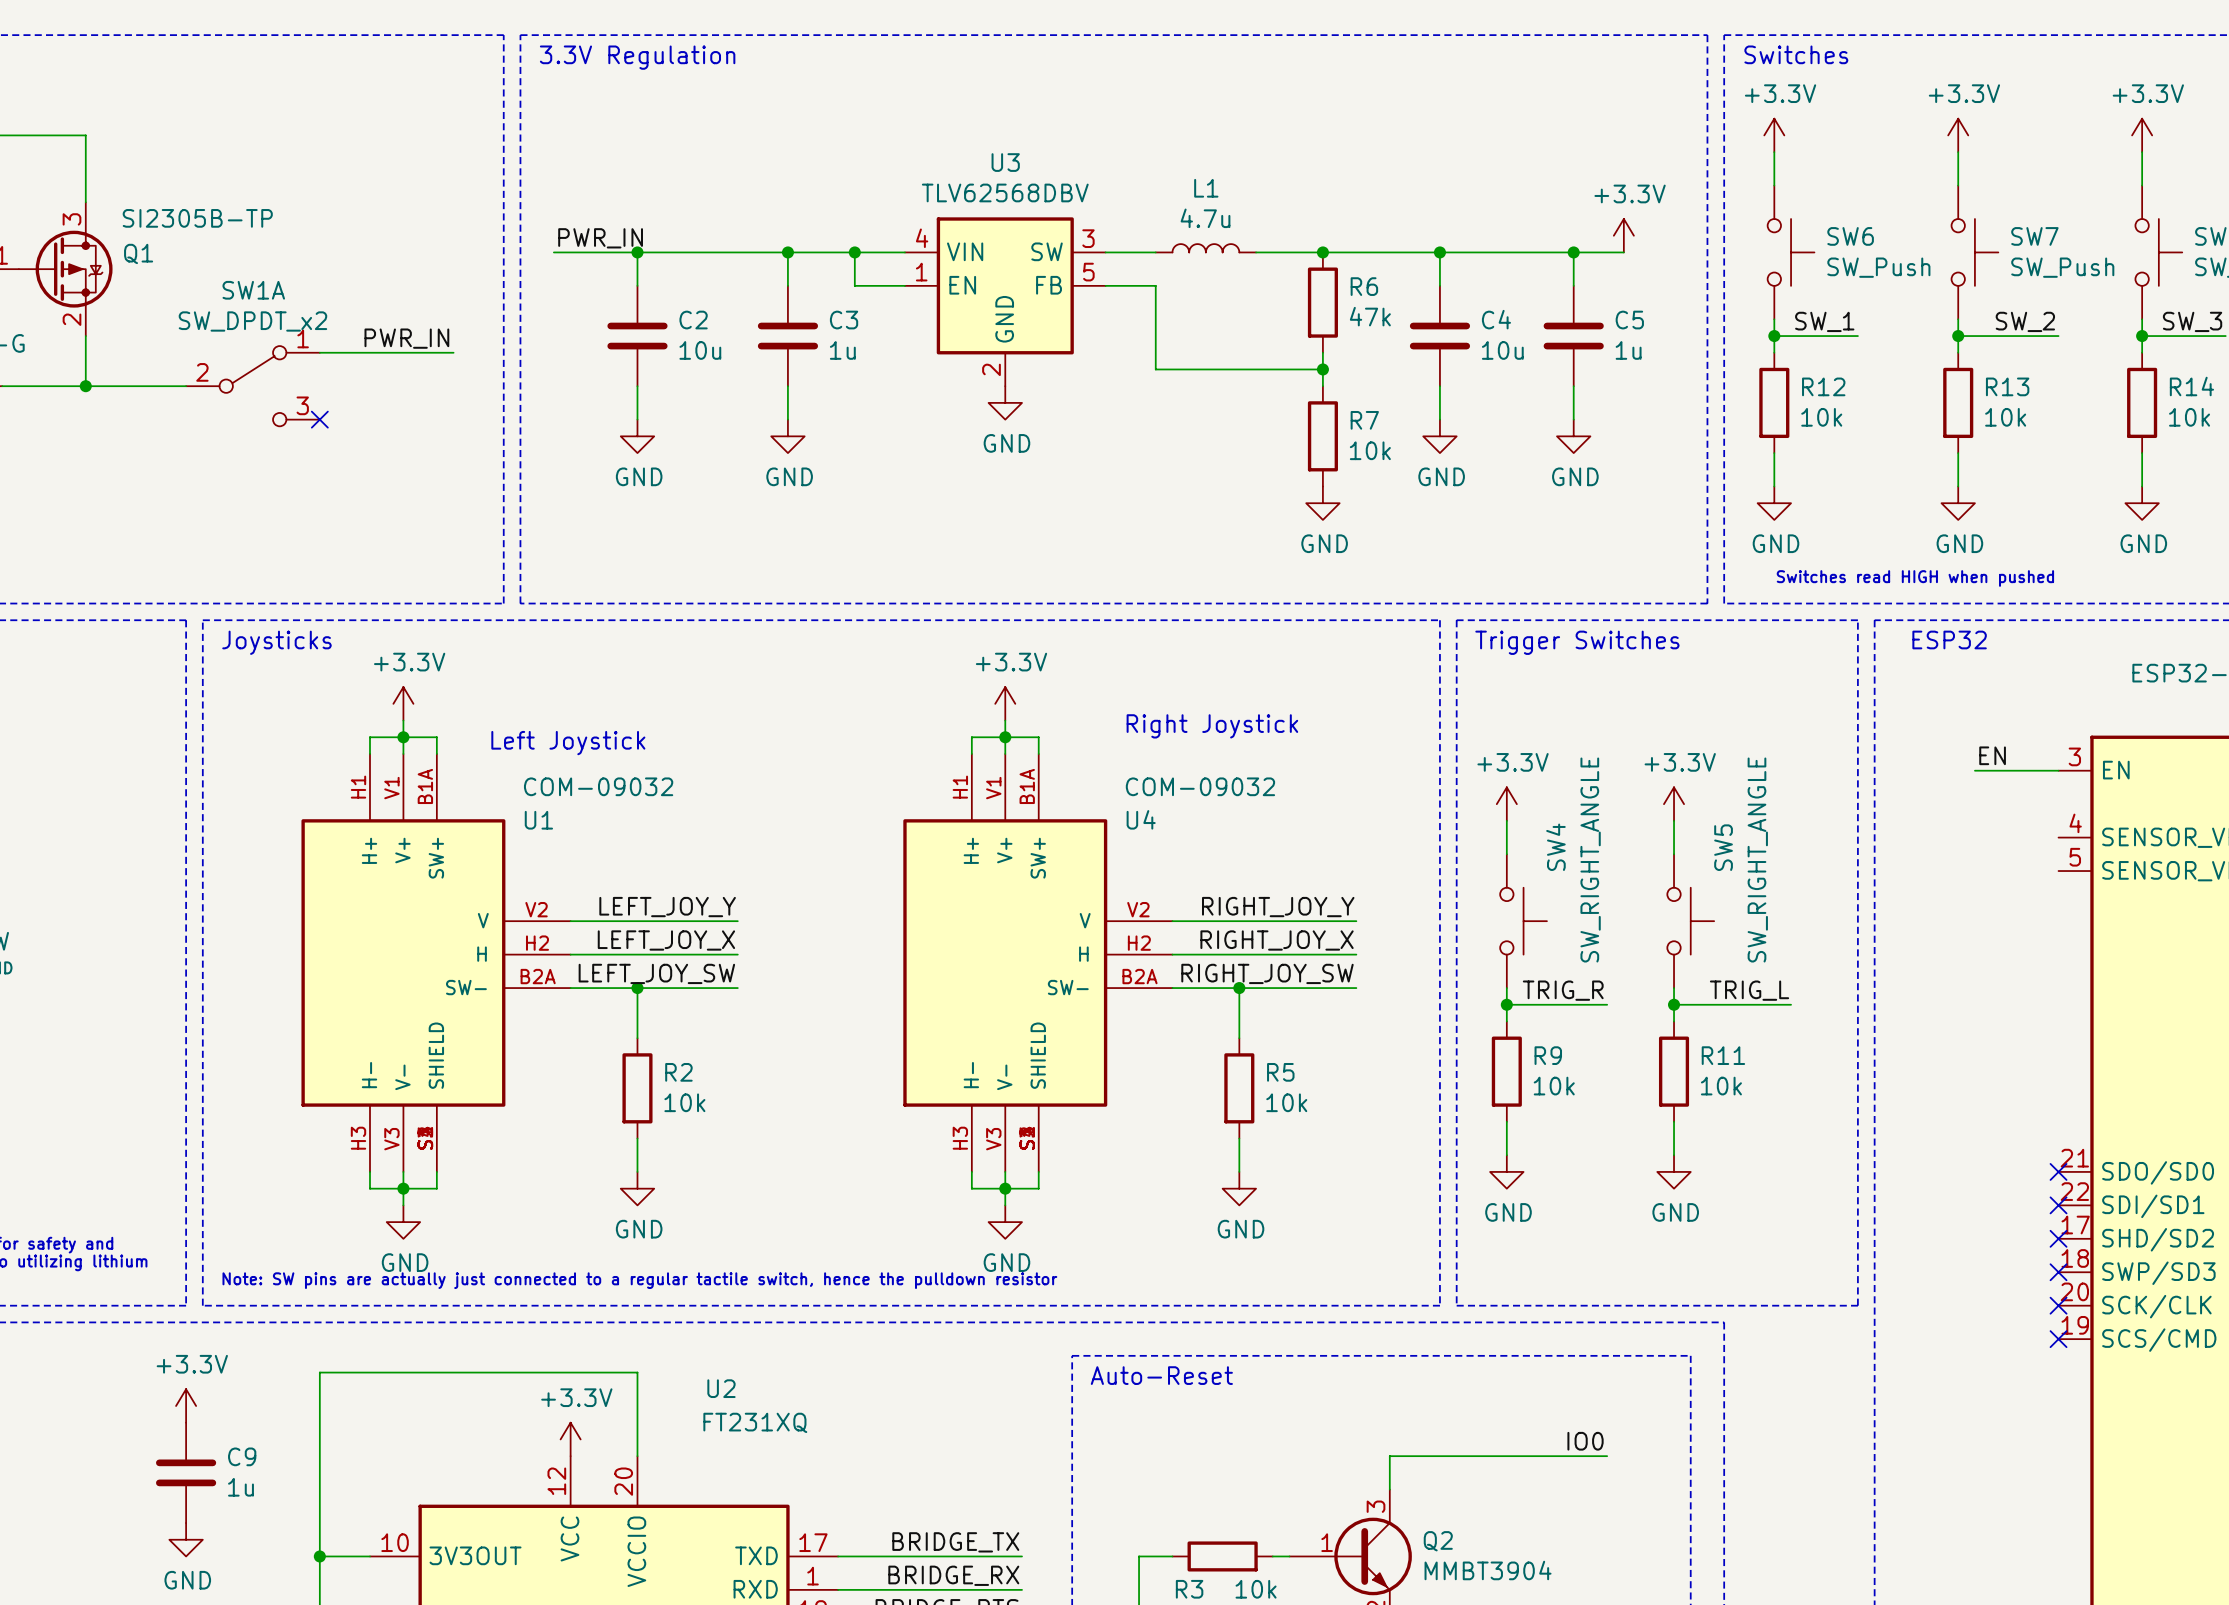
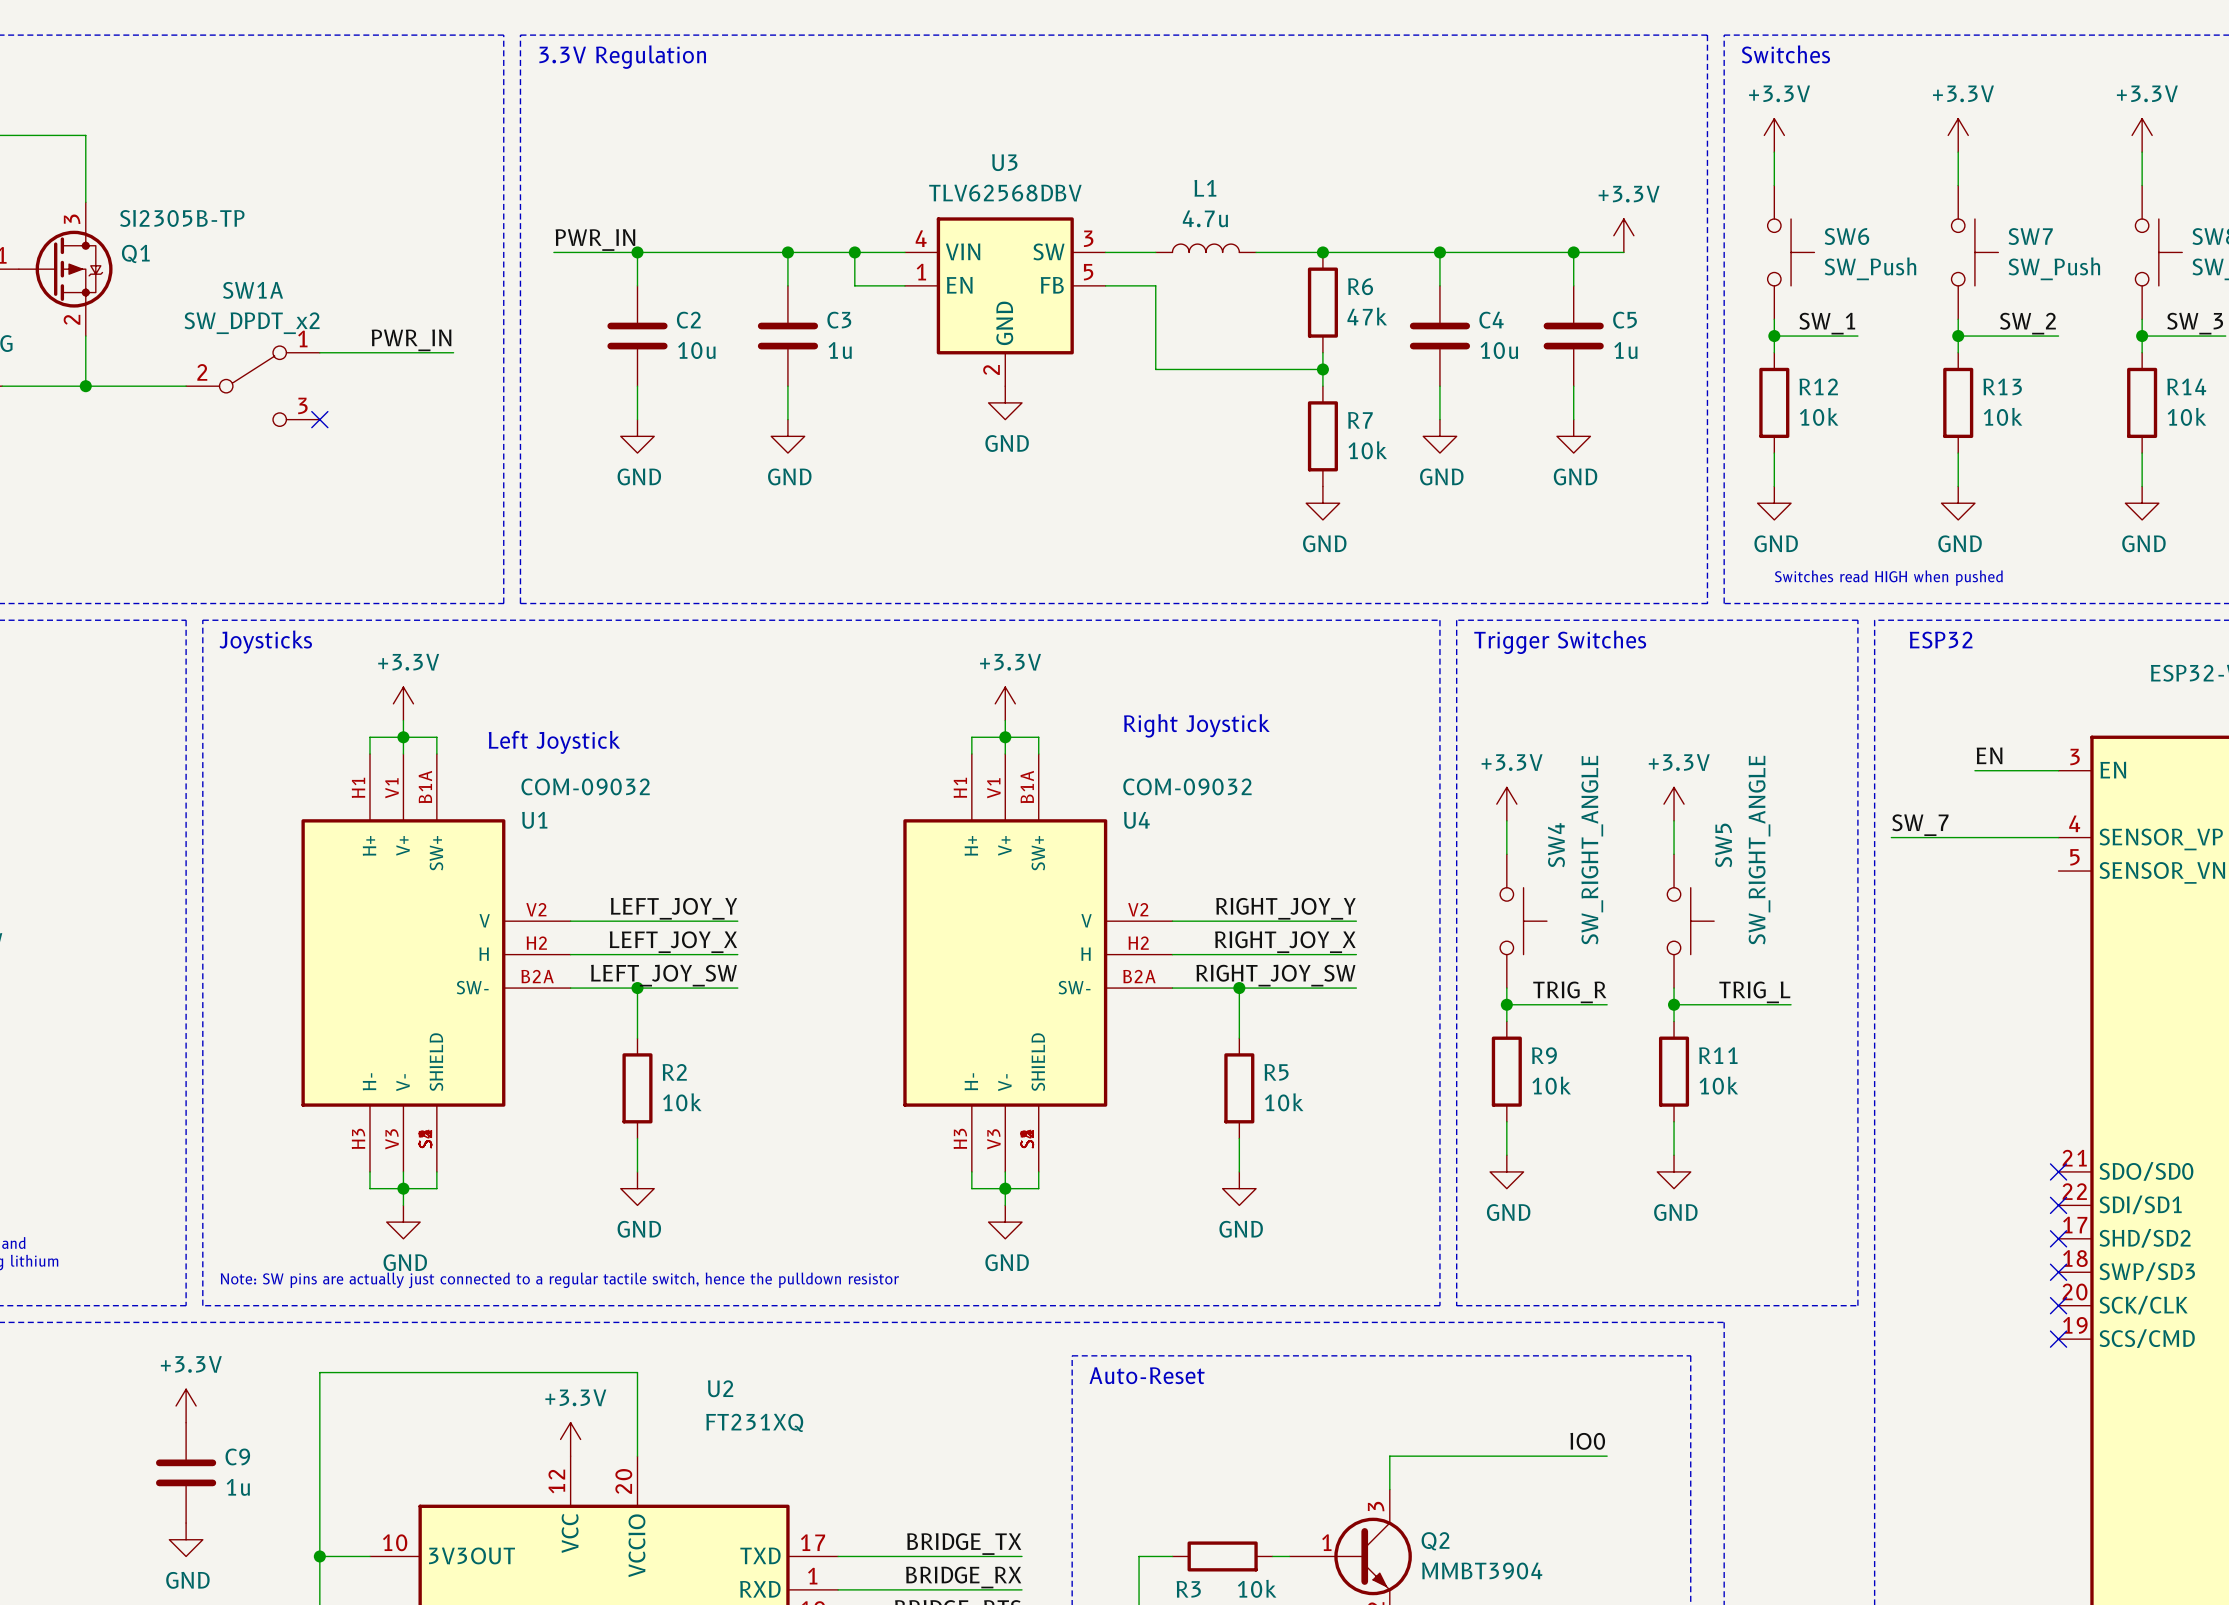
label: none -> SW_7 (1920, 825)
wire: none -> (1891, 837) (2058, 837)

